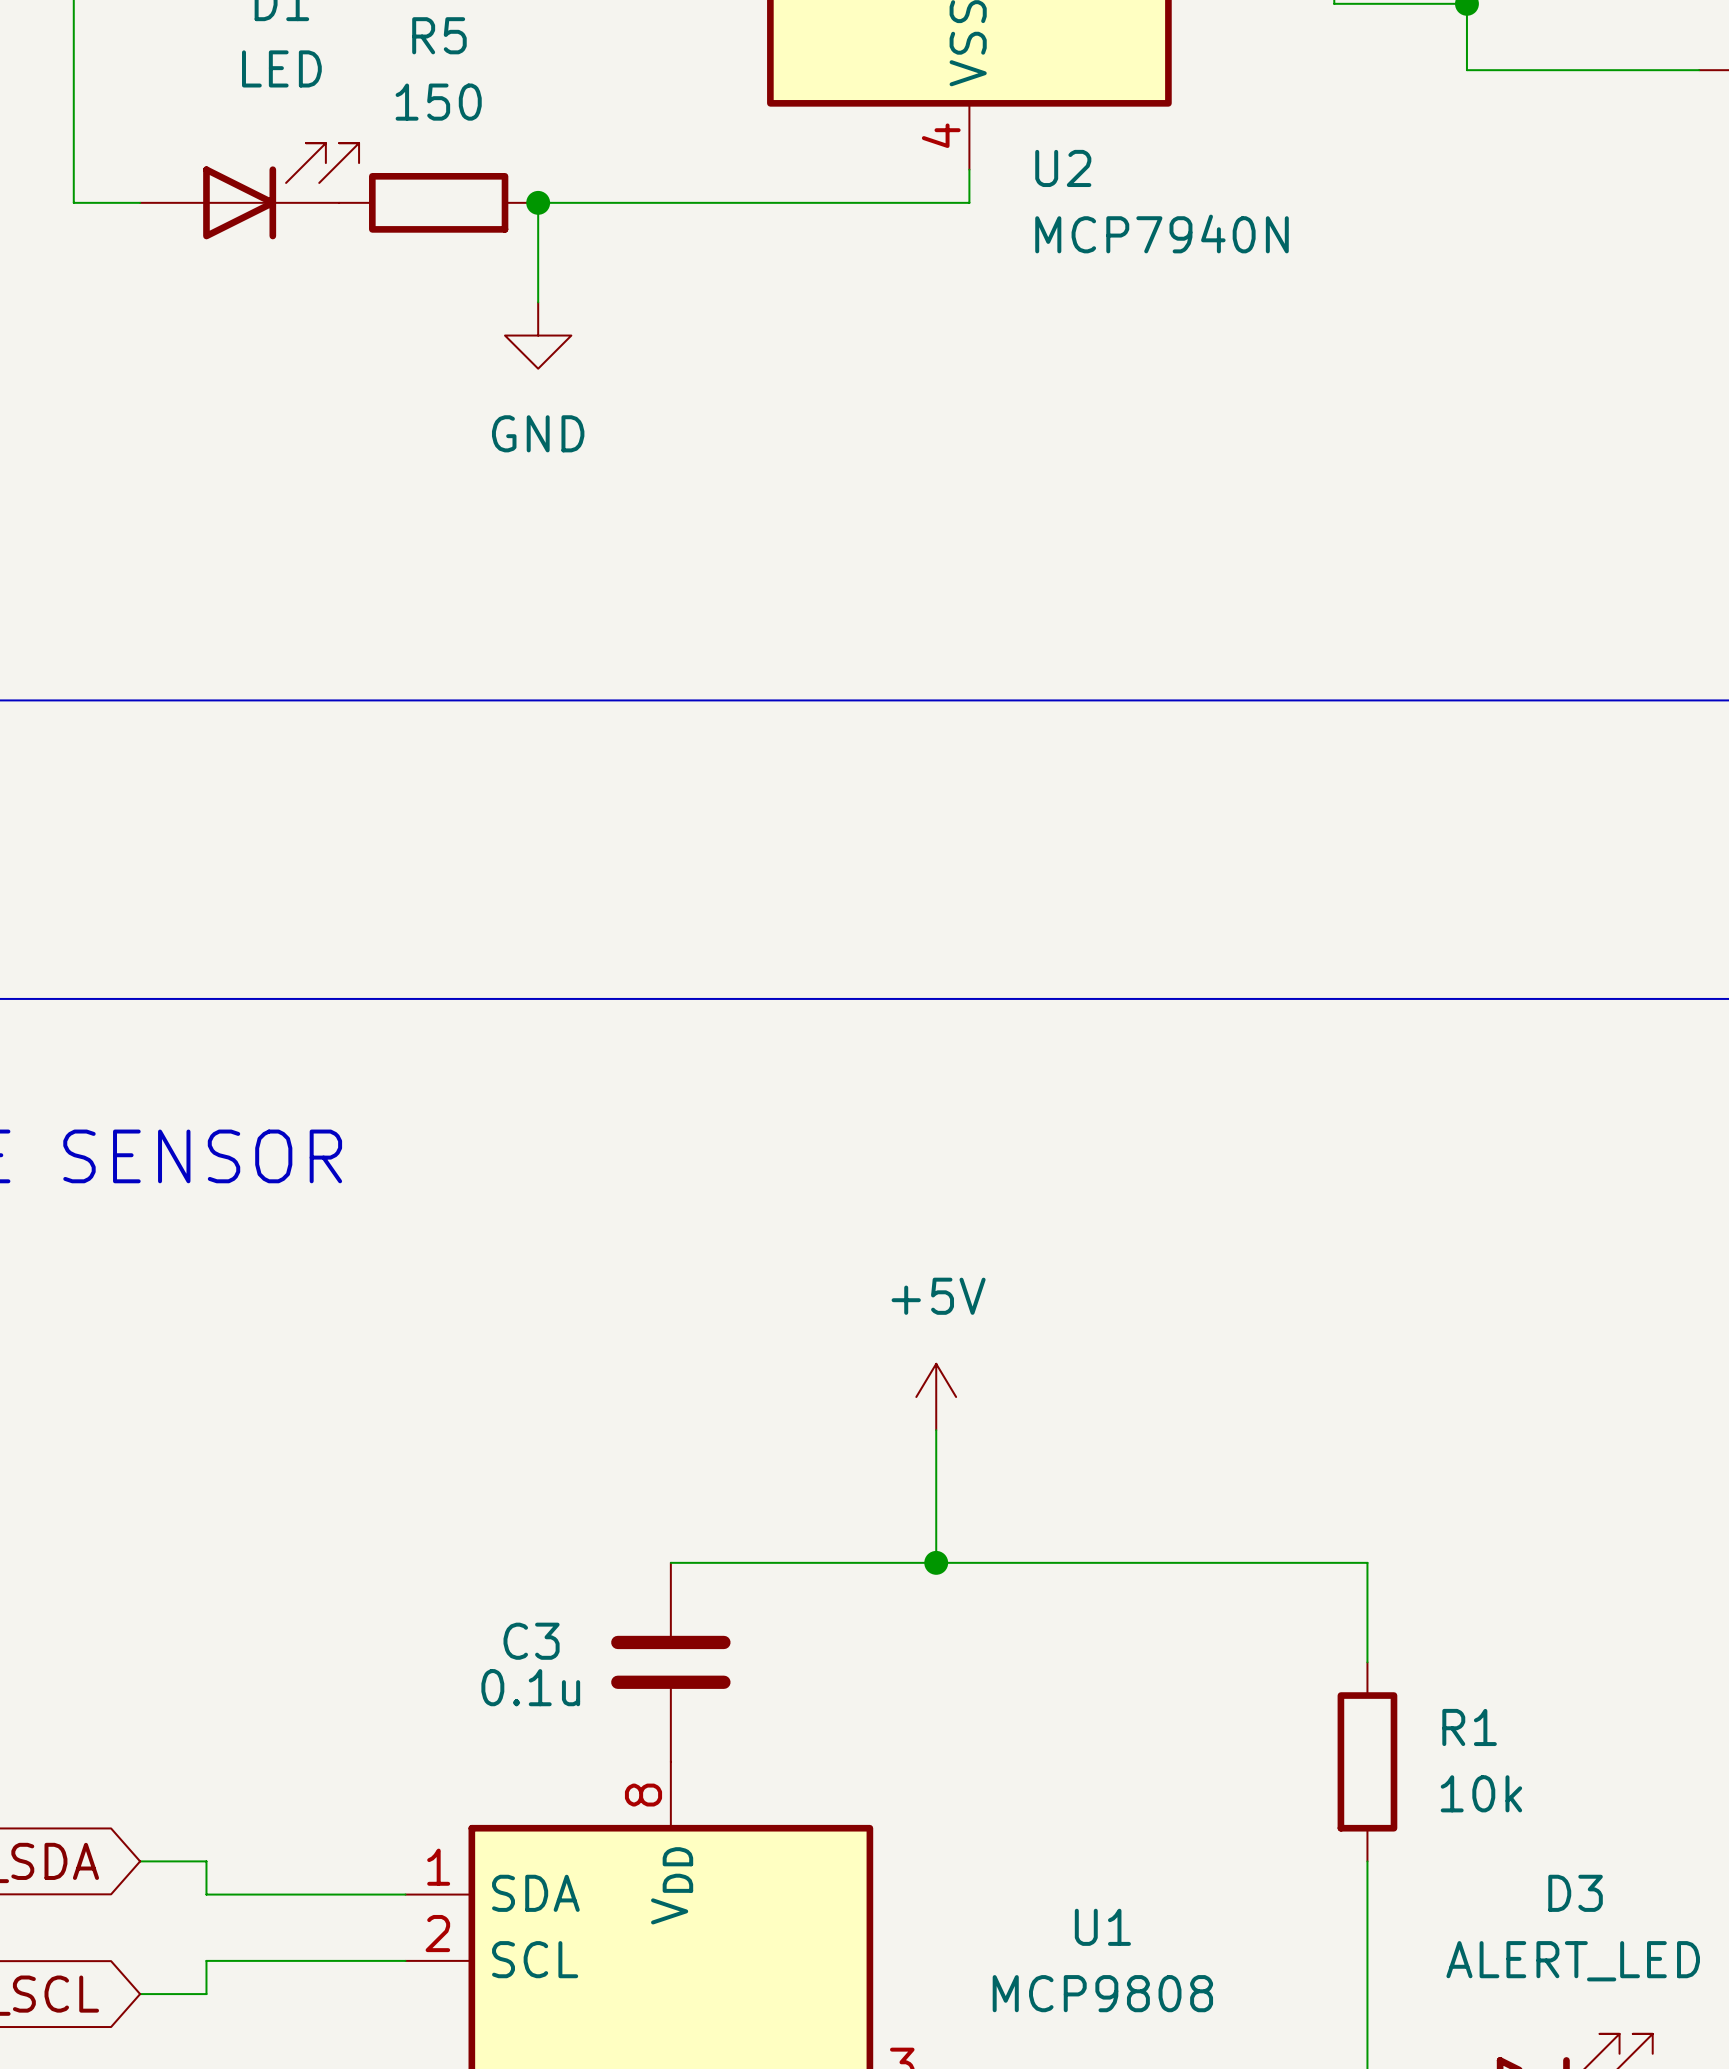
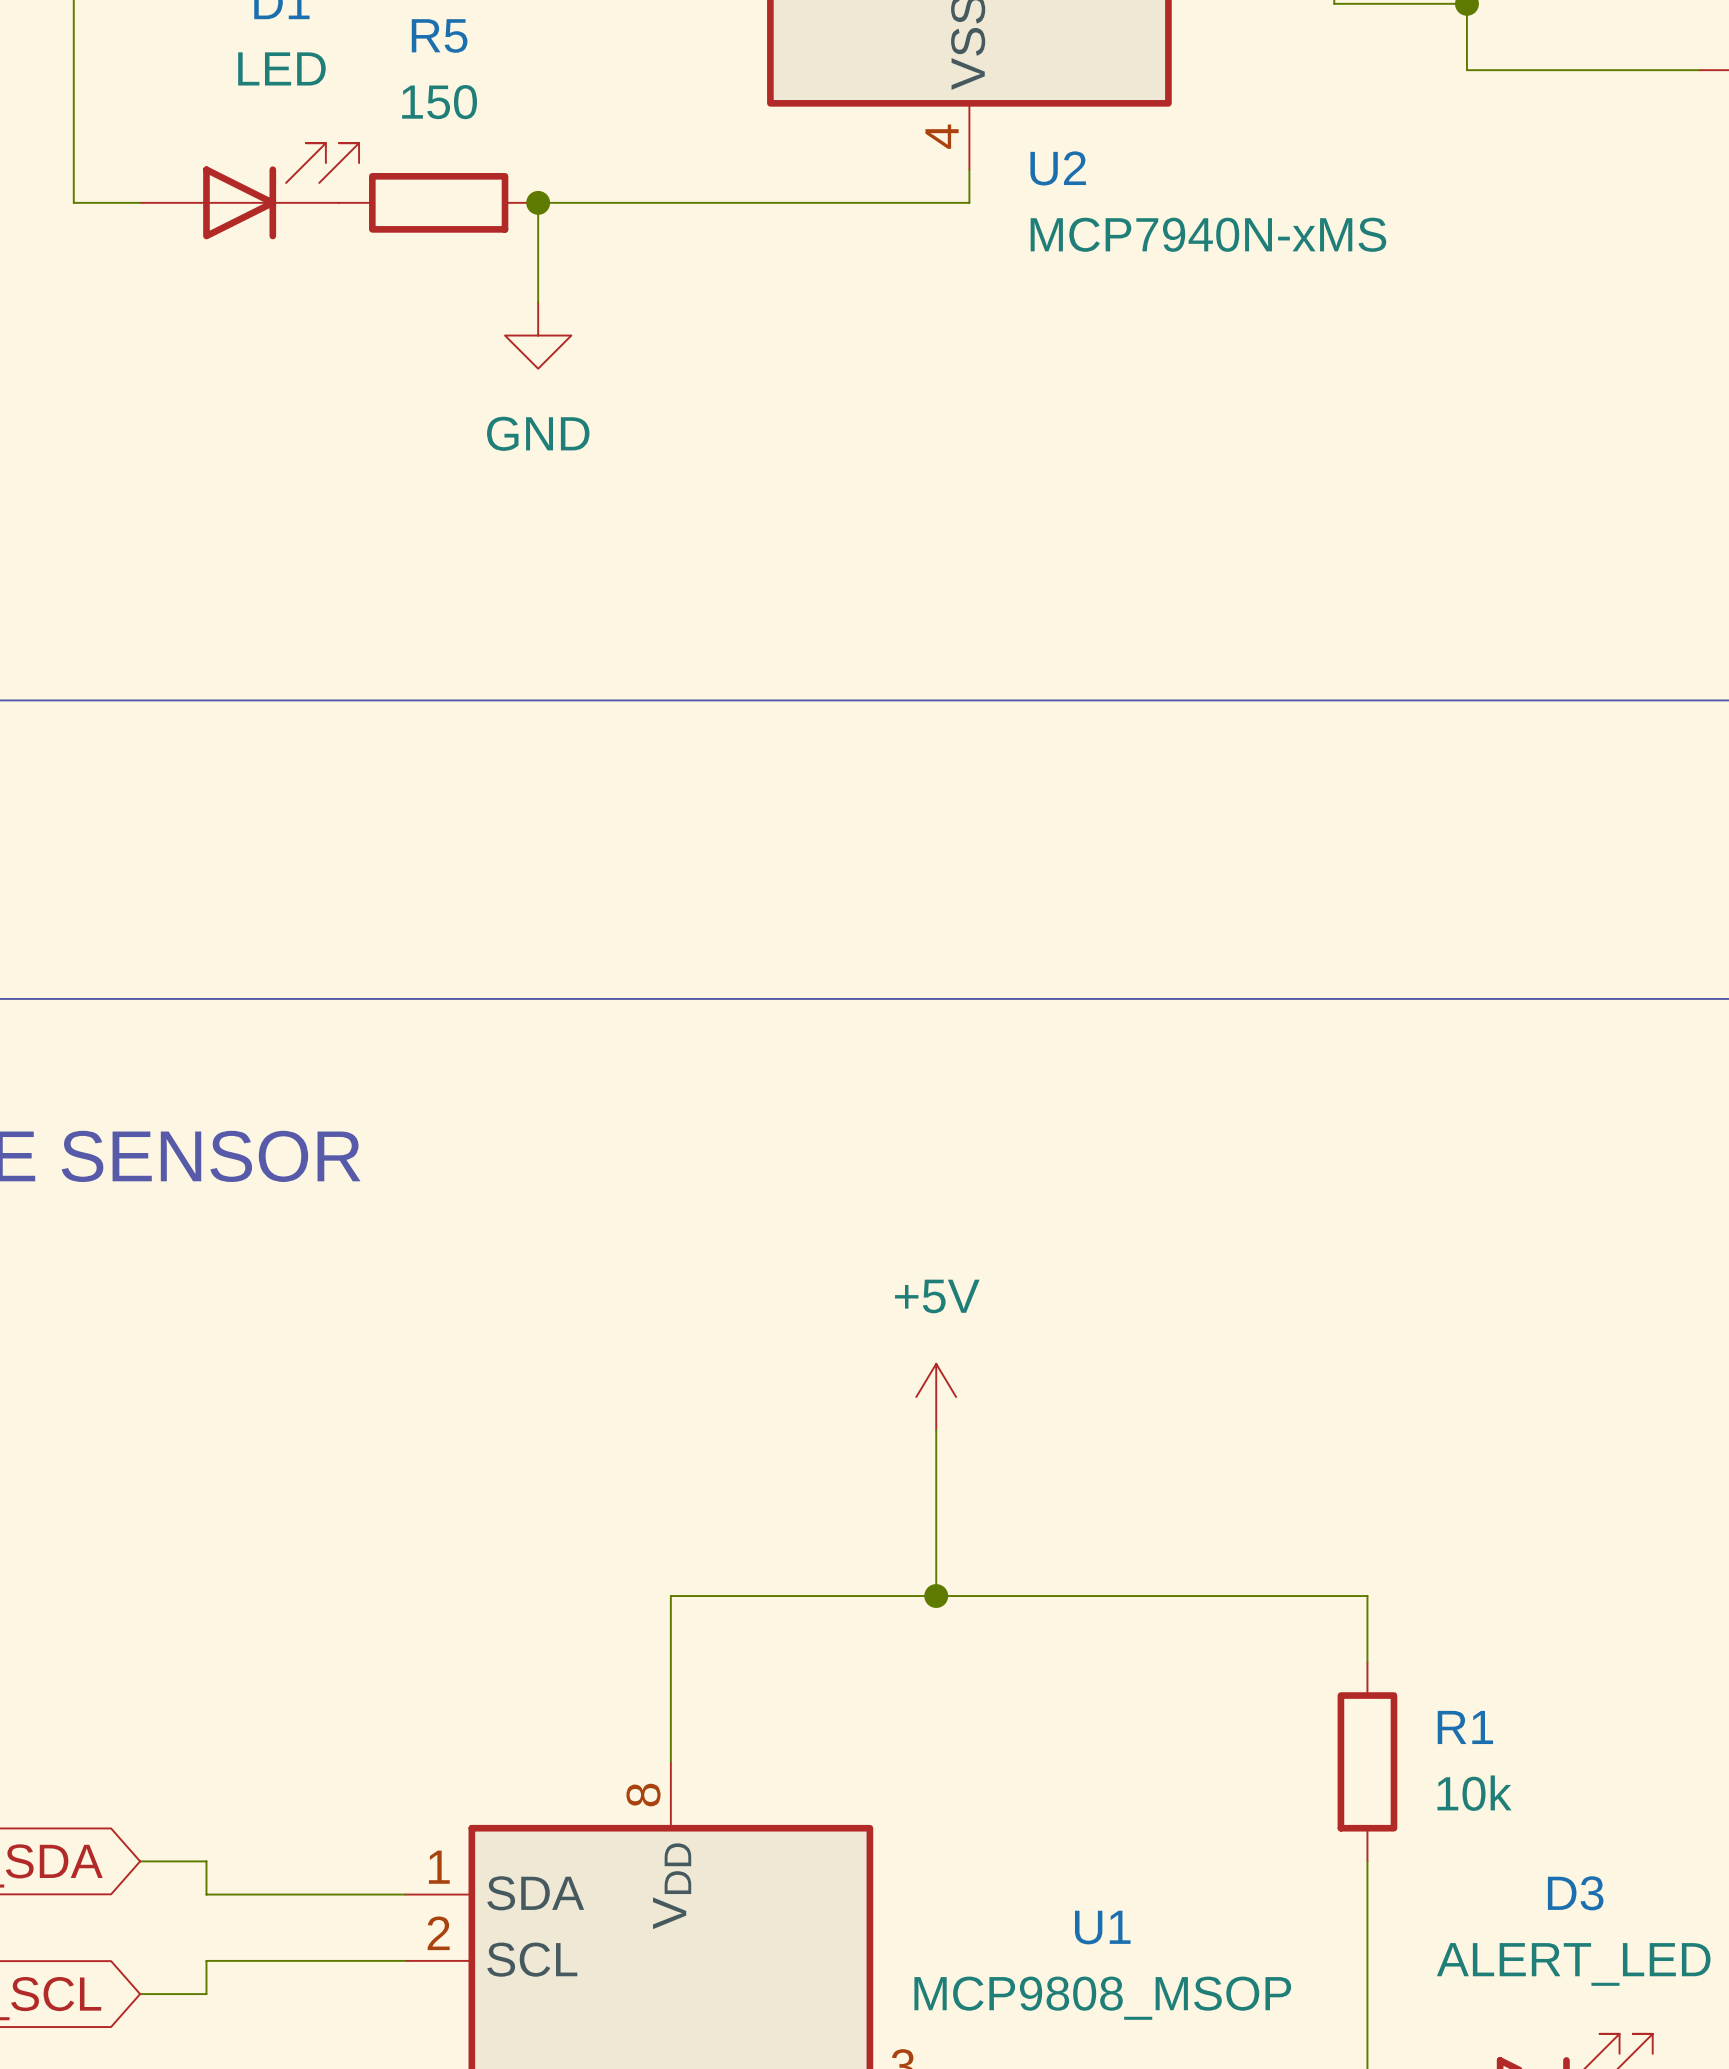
U2 value: MCP7940N (1162, 233) -> MCP7940N-xMS (1208, 234)
wire: (670, 1562) (1367, 1562) (1367, 1596) -> (670, 1761) (670, 1596) (1367, 1596)
wire: none -> (936, 1562) (936, 1596)
junction position: (936, 1562) -> (936, 1596)
C3: 0.1u (670, 1662) -> none
U1 value: MCP9808 (1102, 1993) -> MCP9808_MSOP (1102, 1998)

